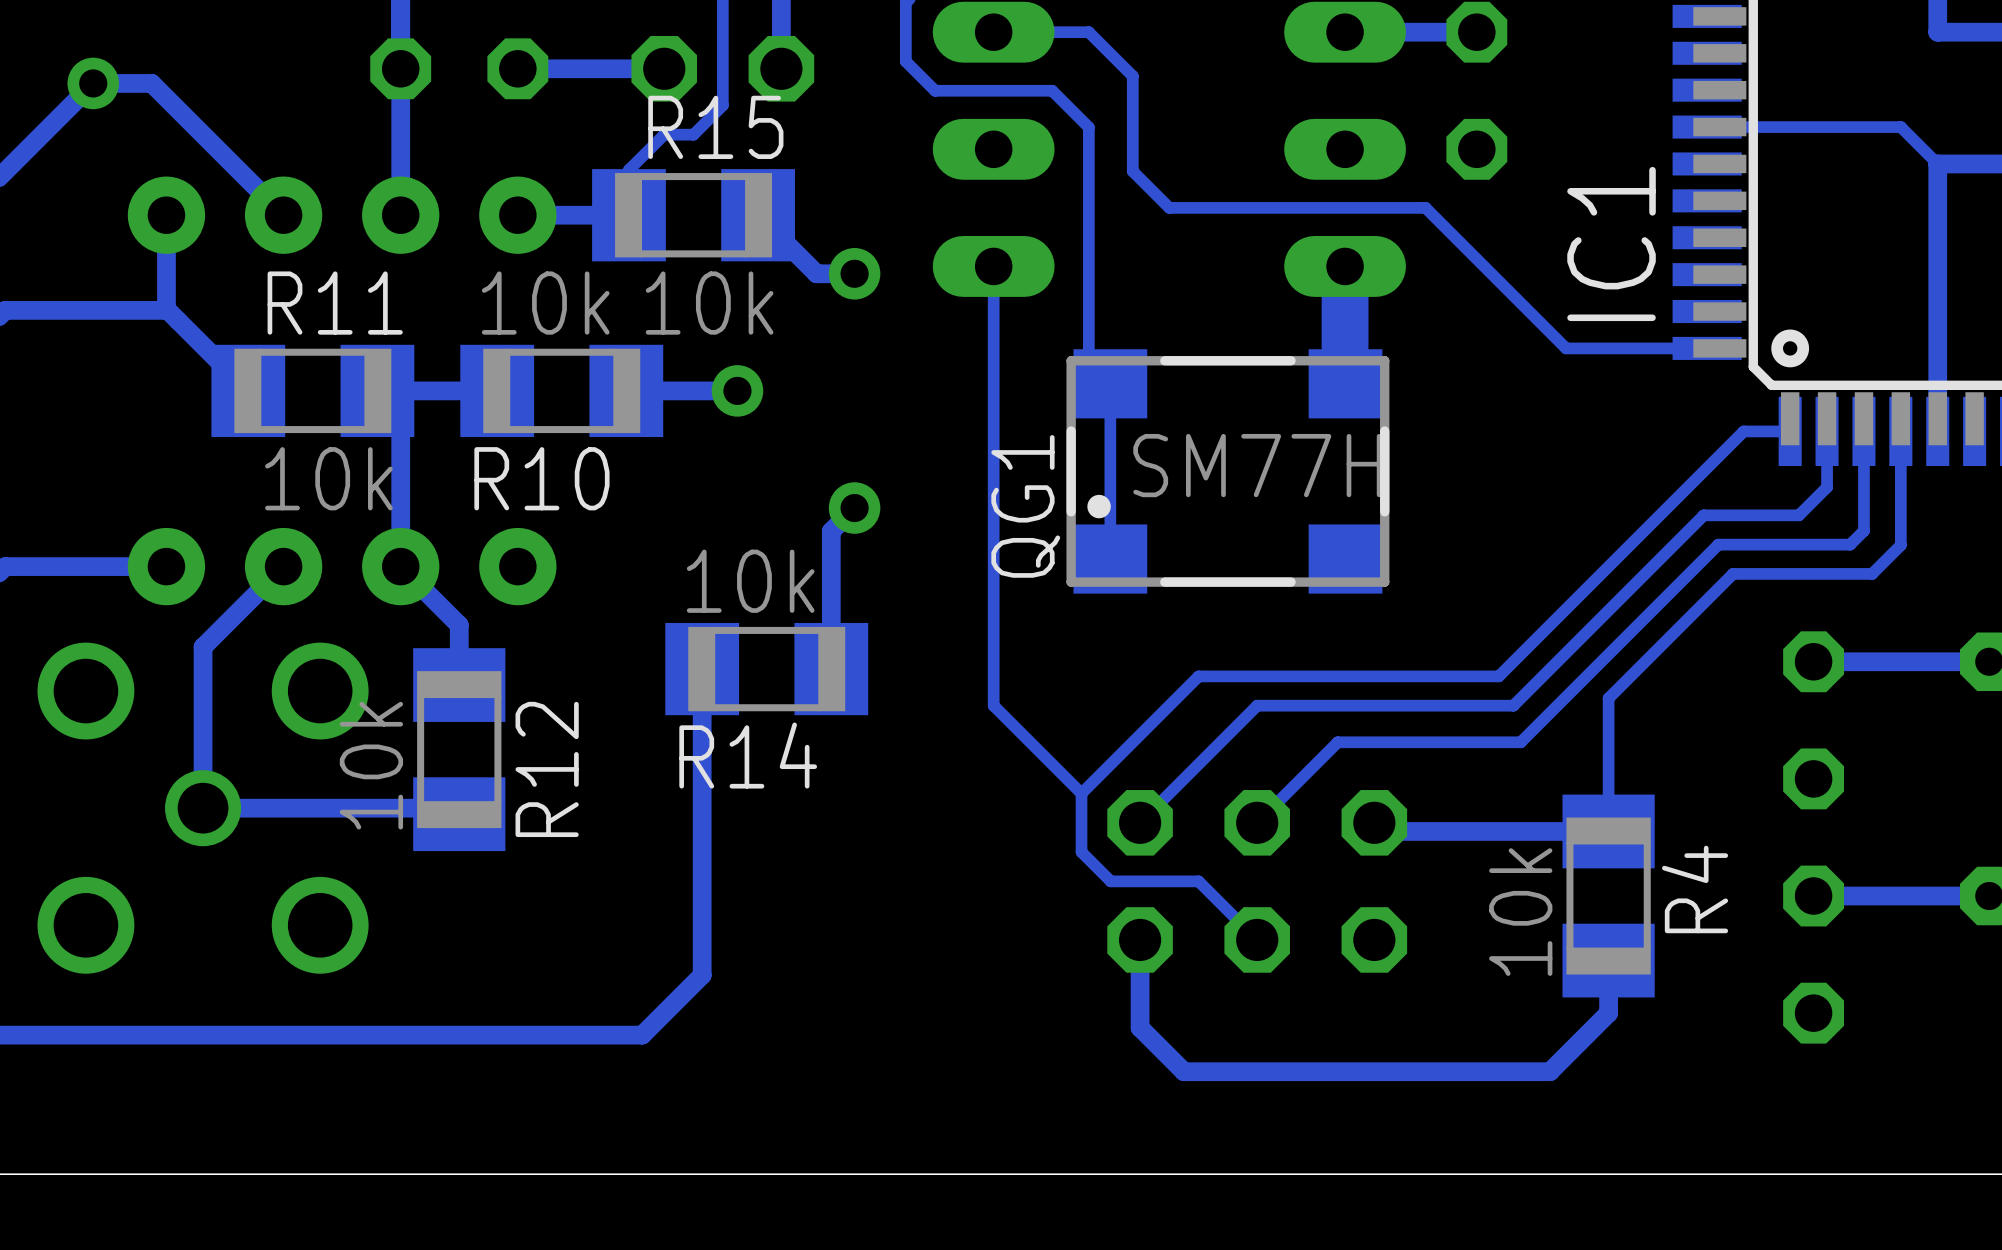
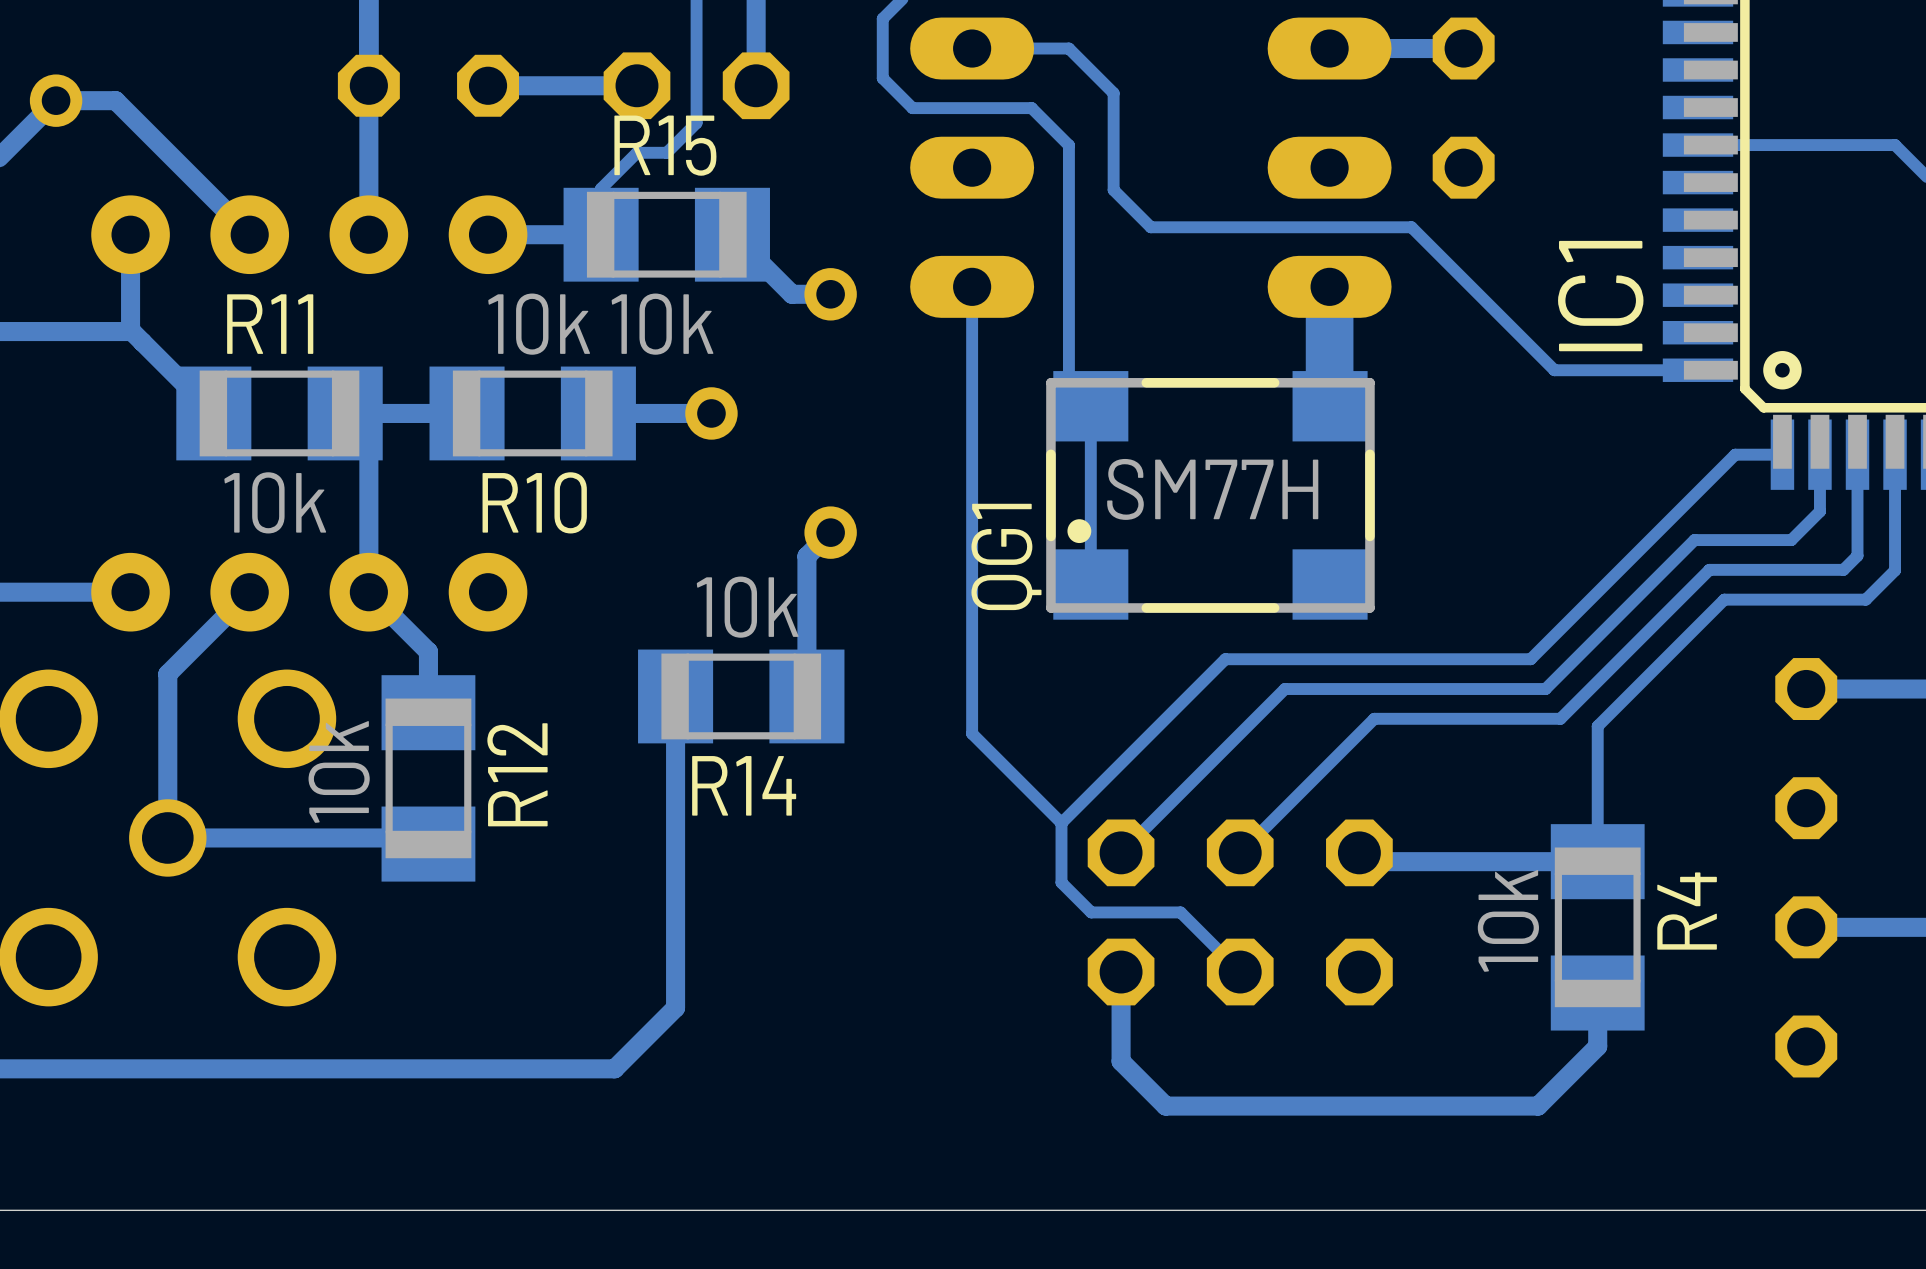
bottom track: (1542, 632) (1498, 676) (1198, 676) -> (1530, 659) (1225, 659) (1180, 703)
bottom track: (1557, 661) (1513, 705) (1257, 705) -> (1545, 689) (1284, 689) (1240, 733)
bottom track: (1572, 691) (1520, 742) (1337, 742) -> (1560, 718) (1374, 718) (1322, 770)

